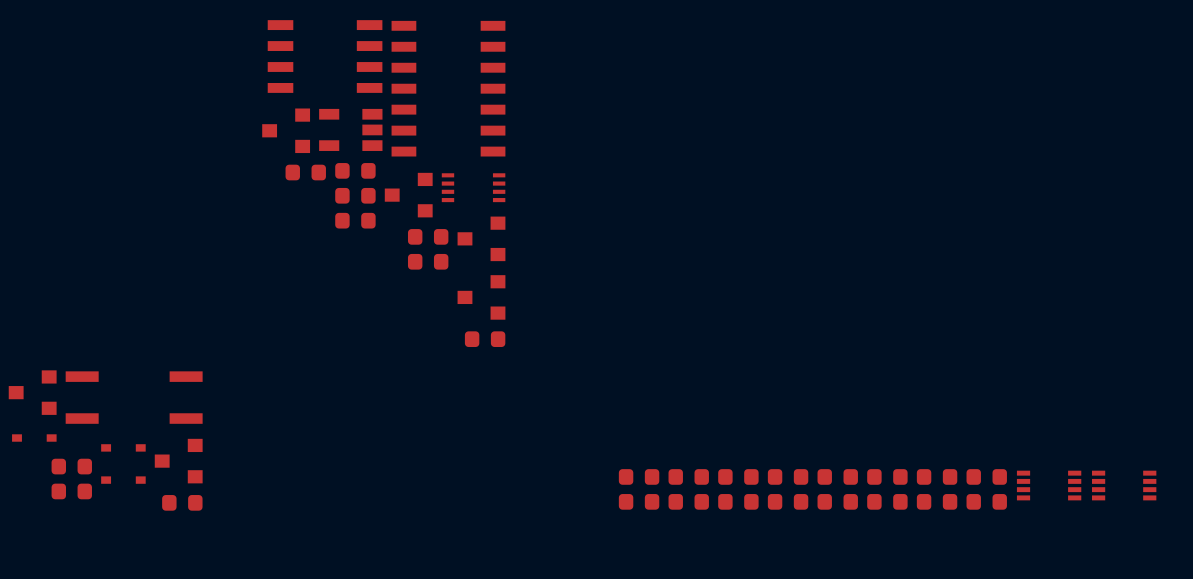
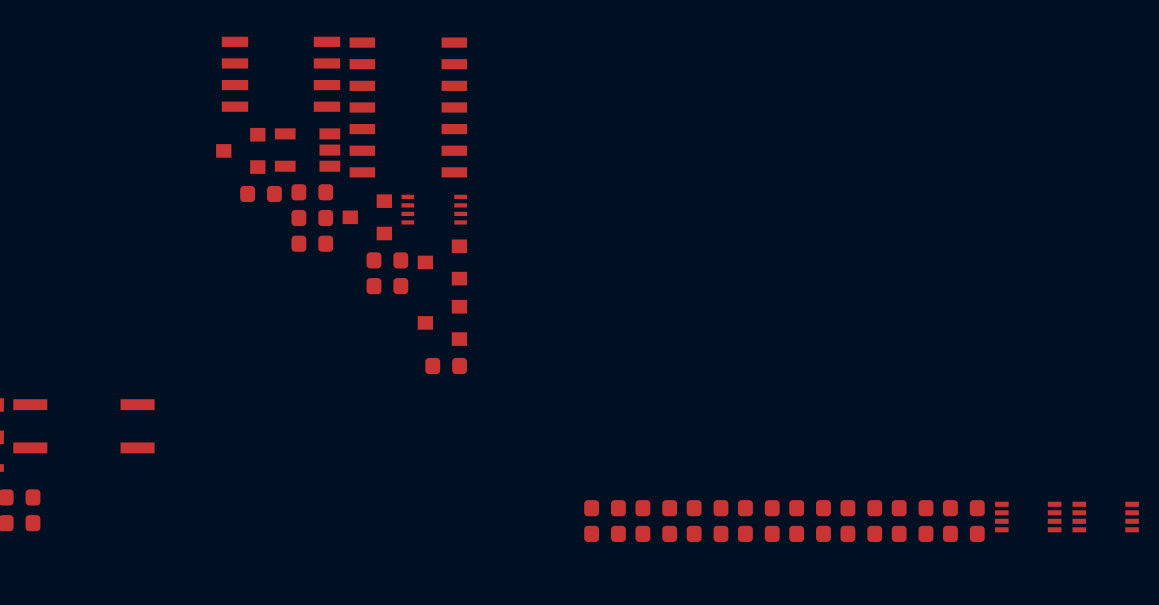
part: (123, 447) -> none
part: (178, 461) -> none
part: (123, 480) -> none
part: (182, 502) -> none

